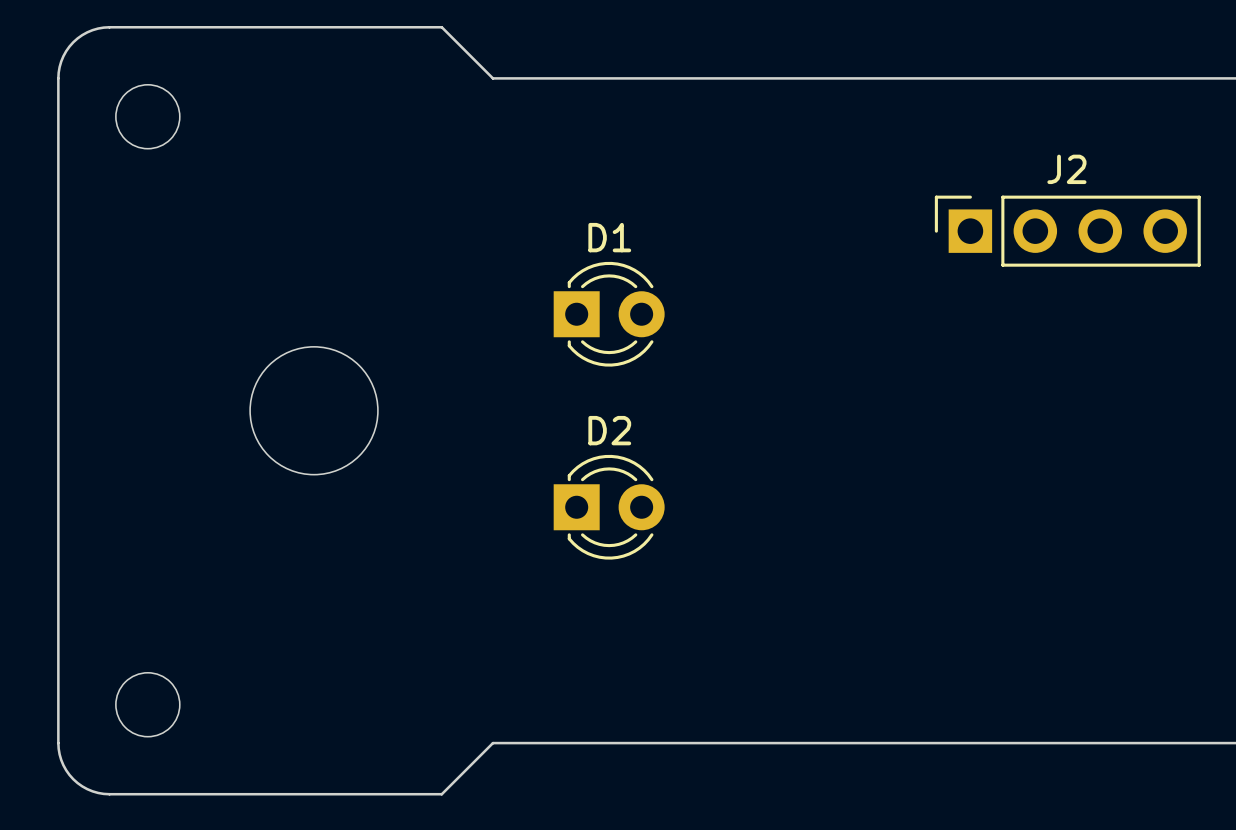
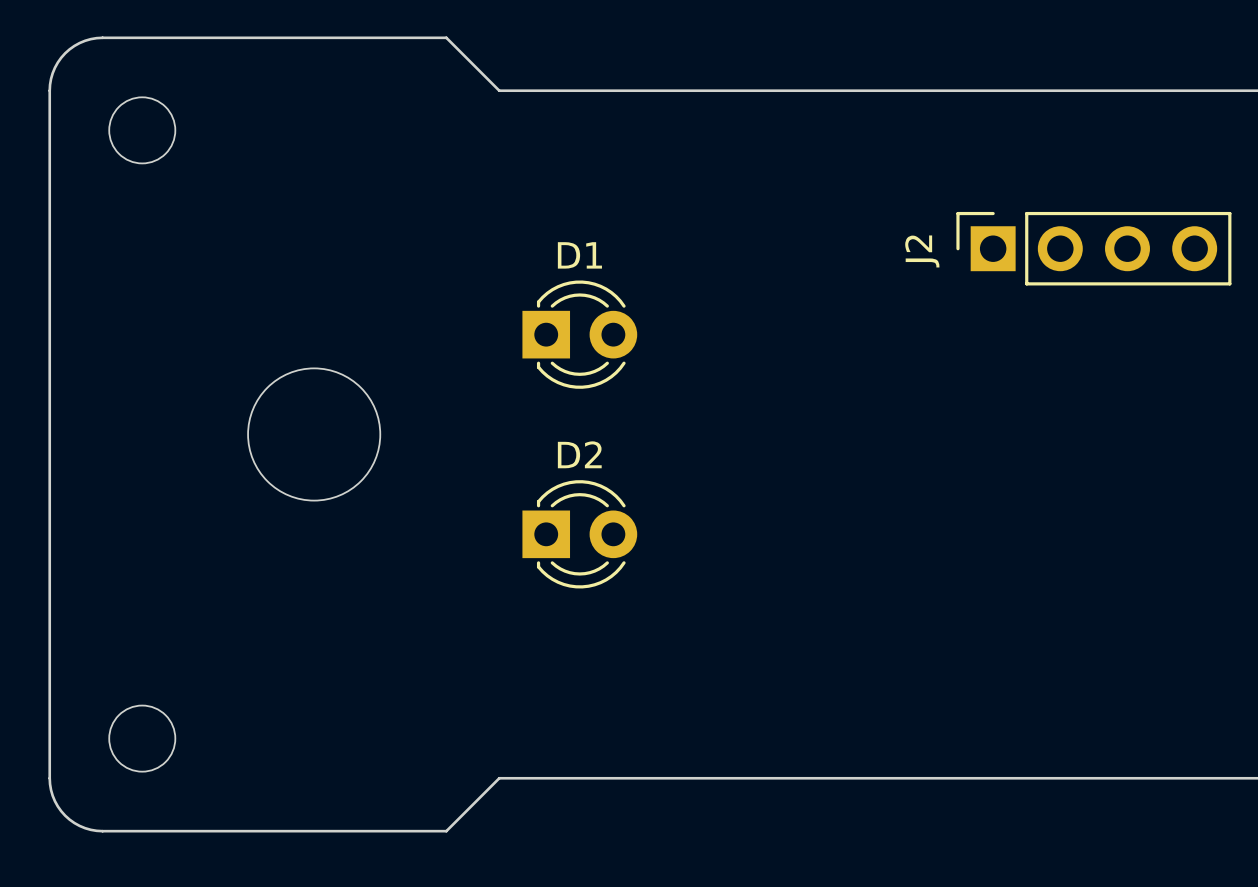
J2 name rotation: 0° (1066, 169) -> 90° counterclockwise (922, 251)
J2 name position: J2 (1066, 169) -> J2 (922, 251)
D1 position: (609, 314) -> (579, 334)
D2 position: (609, 507) -> (579, 534)

